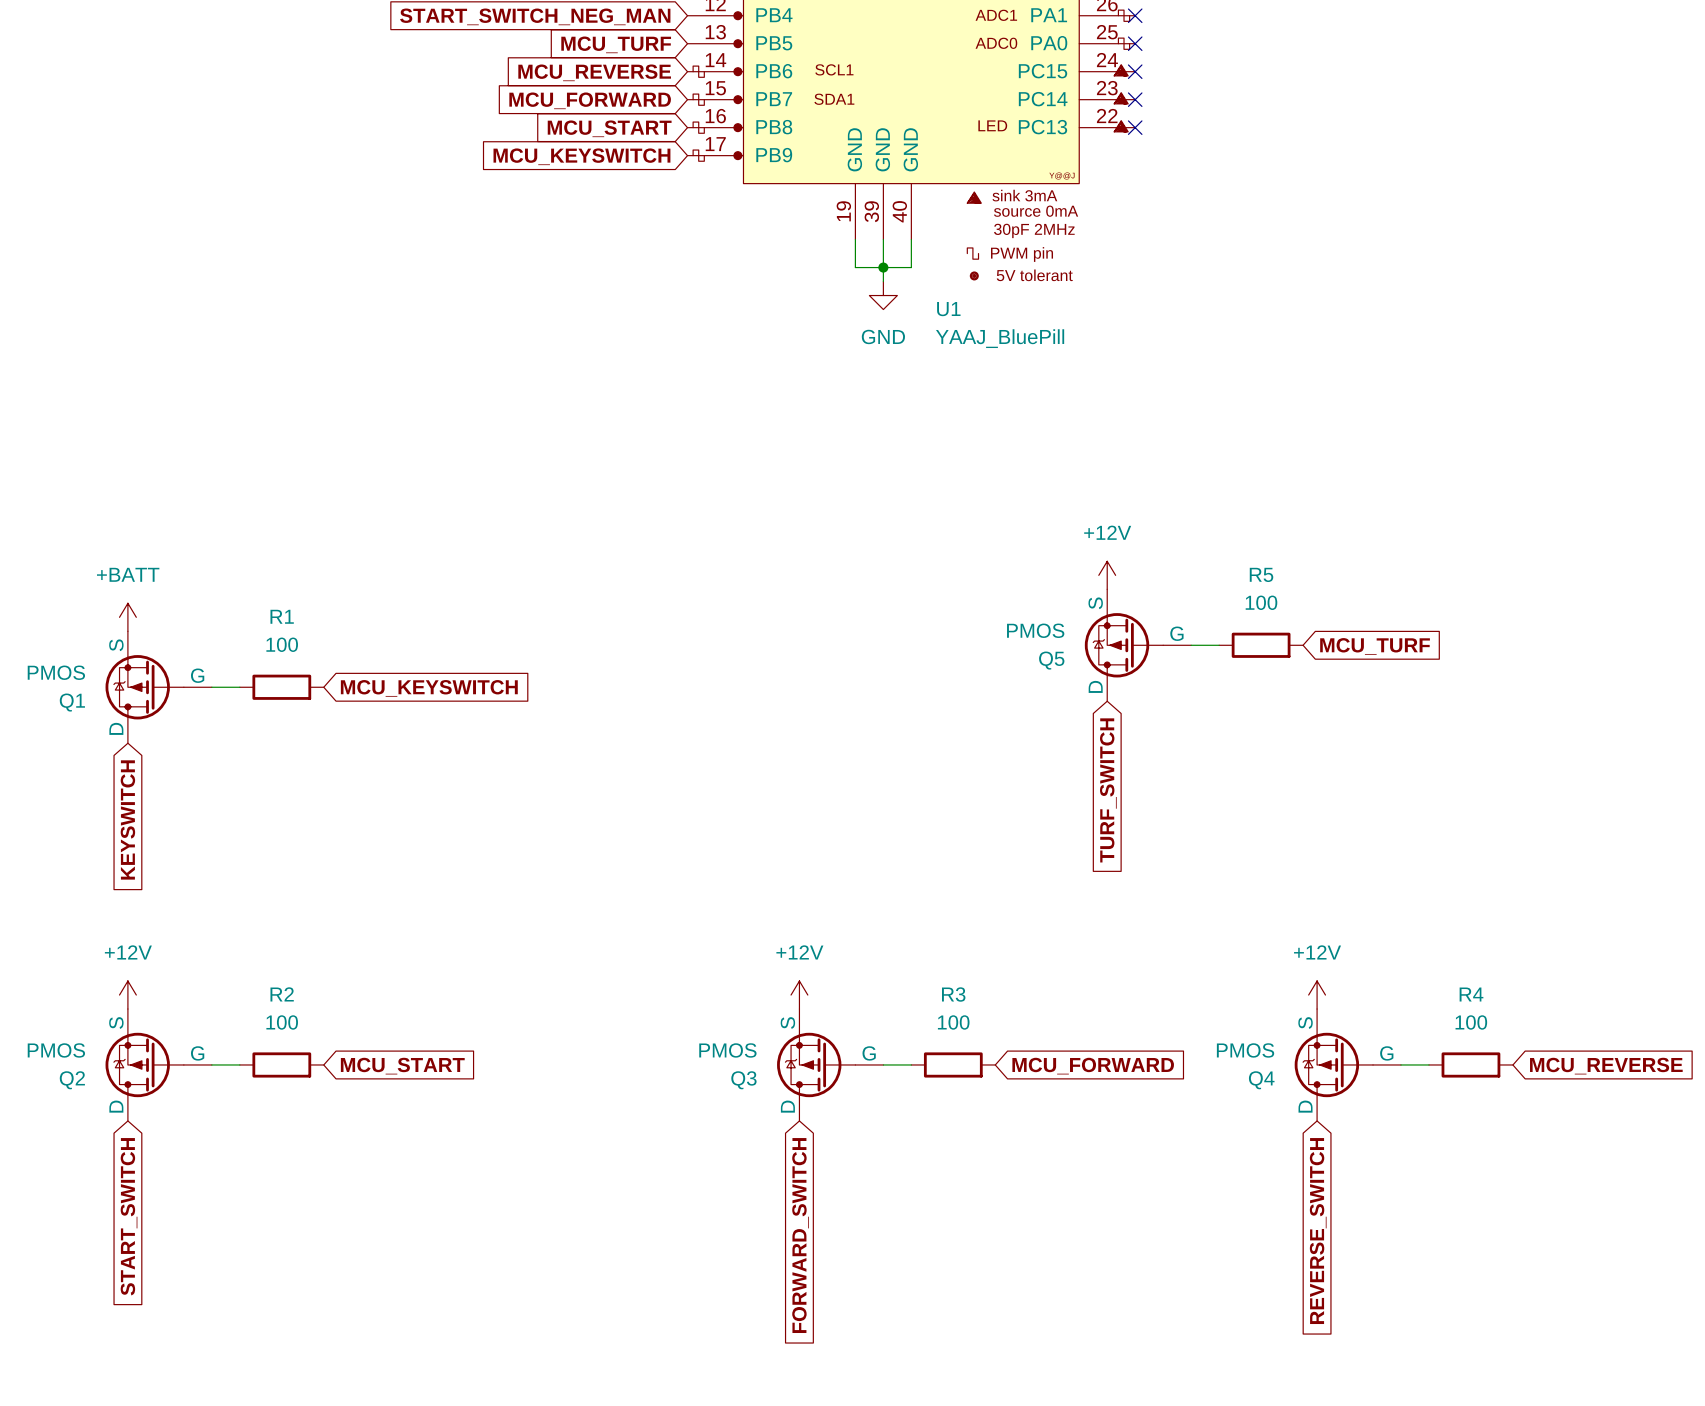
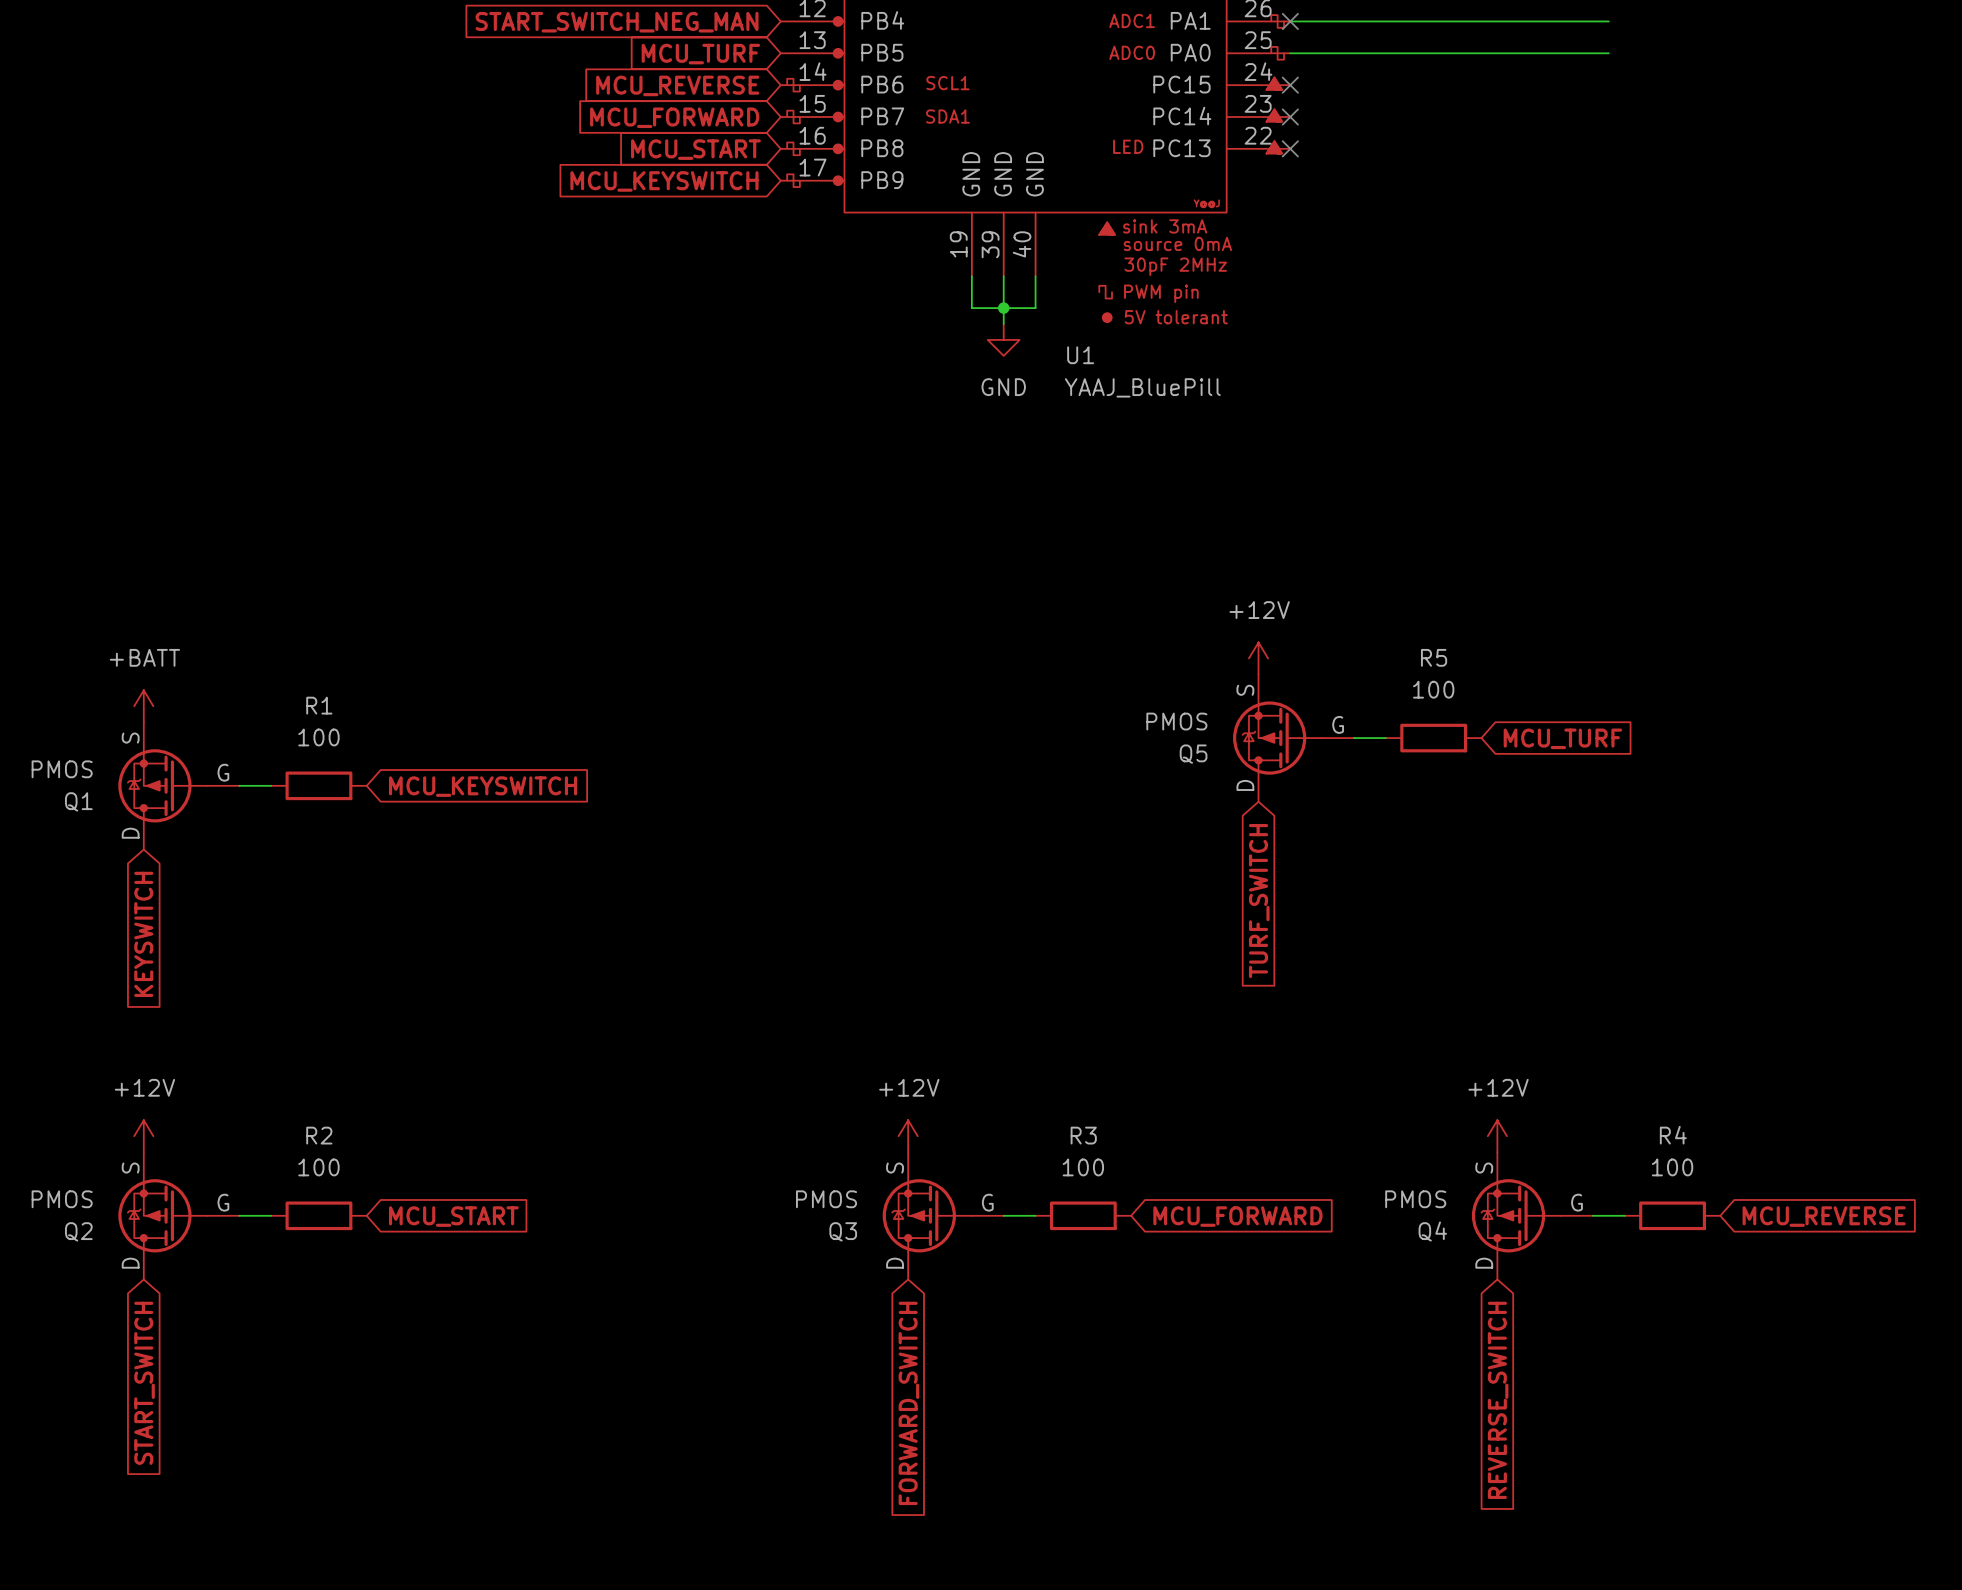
wire: none -> (1290, 21) (1608, 21)
wire: none -> (1290, 53) (1608, 53)
no-connect mark: (1135, 43) -> none

